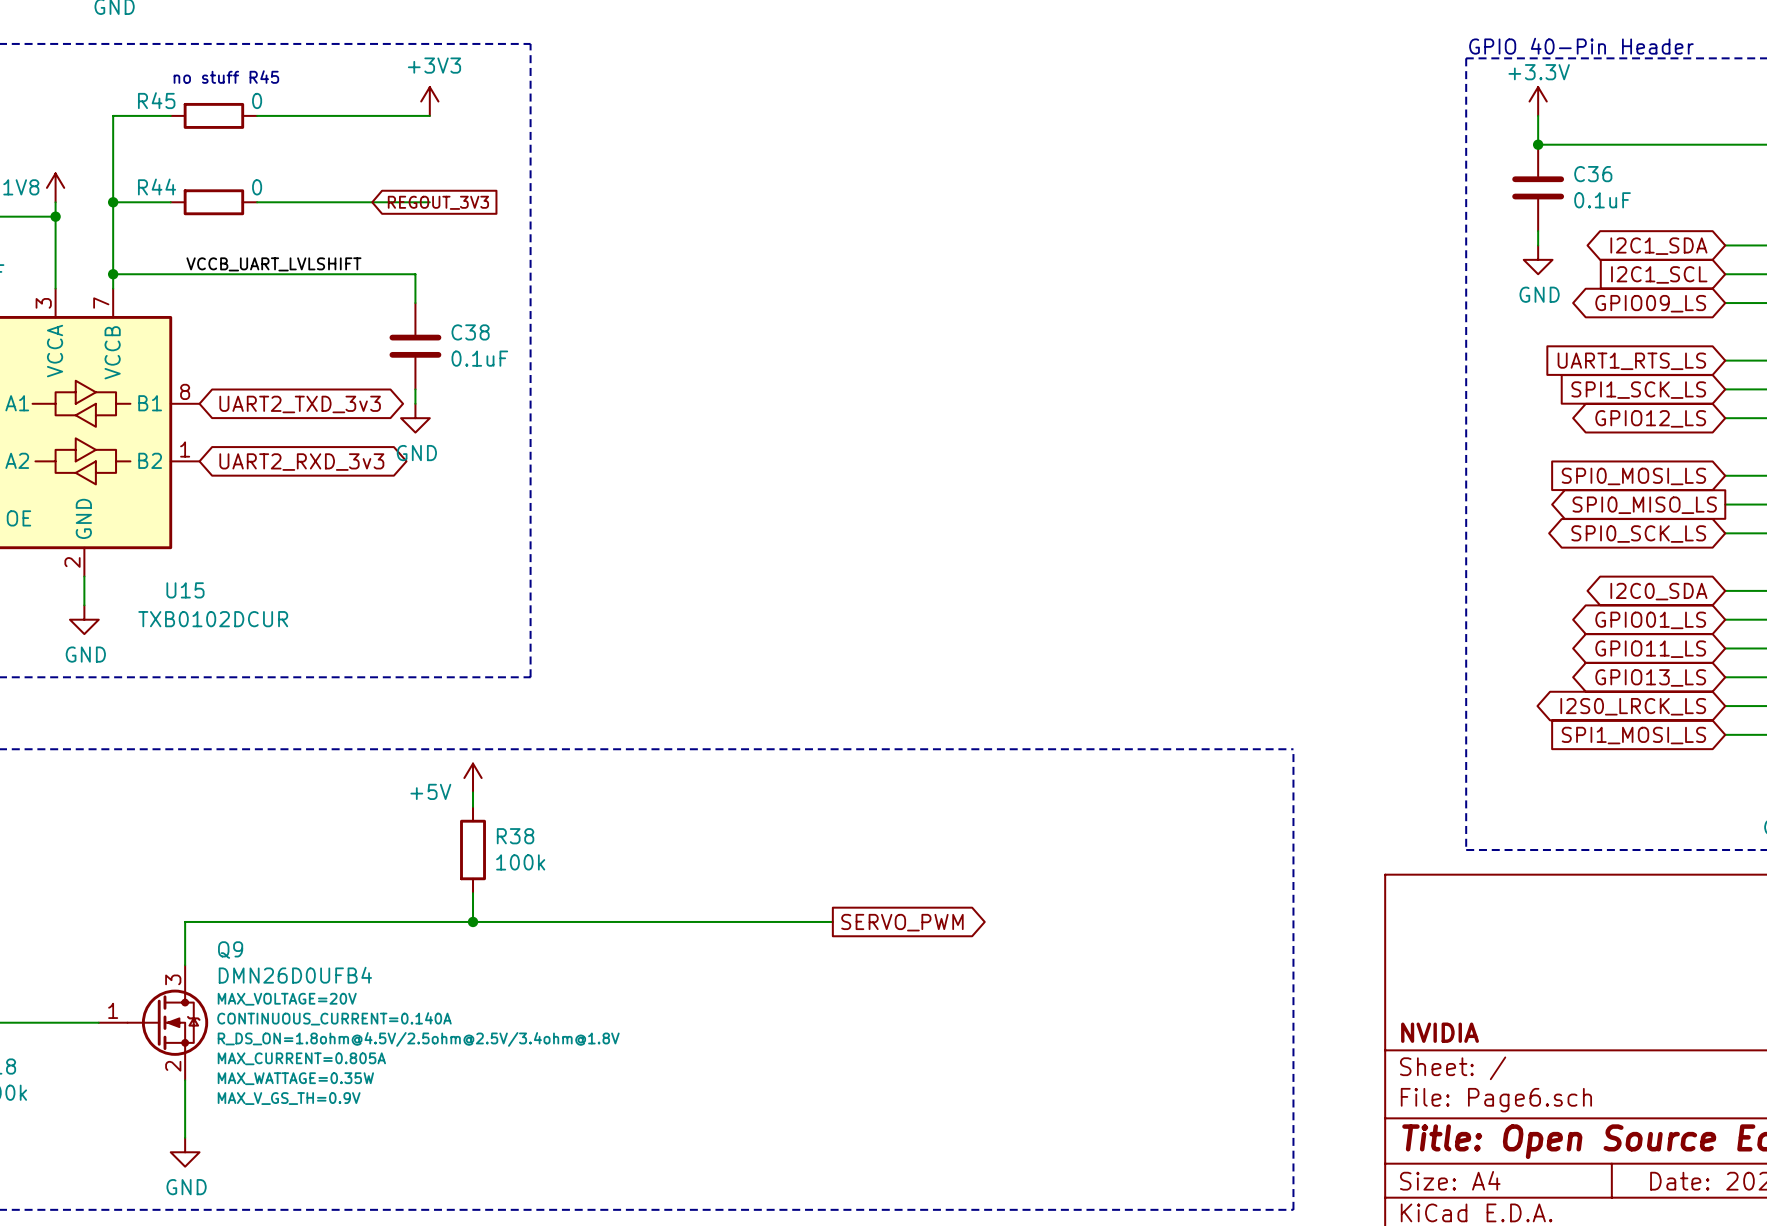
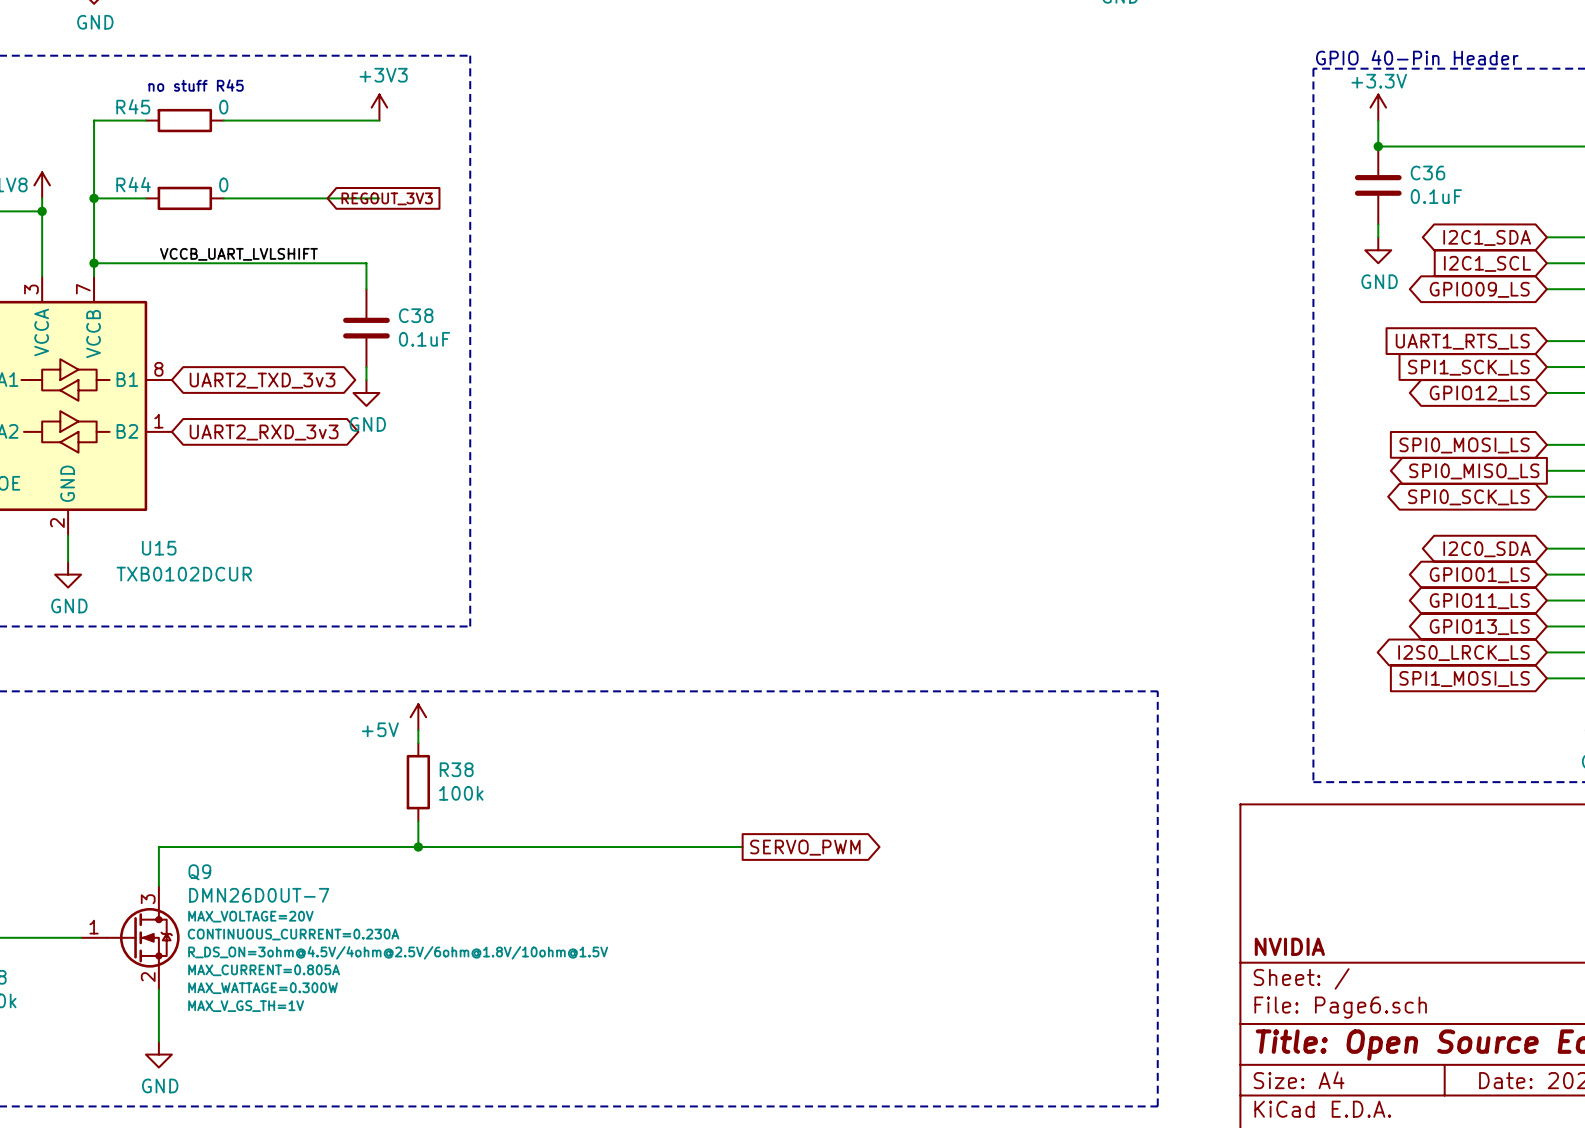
Q9 value: DMN26D0UFB4 (295, 975) -> DMN26D0UT-7 (259, 895)
Q9 text: CONTINUOUS_CURRENT=0.140A (334, 1018) -> CONTINUOUS_CURRENT=0.230A (293, 934)
Q9 text: R_DS_ON=1.8ohm@4.5V/2.5ohm@2.5V/3.4ohm@1.8V (418, 1039) -> R_DS_ON=3ohm@4.5V/4ohm@2.5V/6ohm@1.8V/10ohm@1.5V (398, 952)
Q9 text: MAX_WATTAGE=0.35W (295, 1078) -> MAX_WATTAGE=0.300W (263, 988)
Q9 text: MAX_V_GS_TH=0.9V (289, 1098) -> MAX_V_GS_TH=1V (246, 1006)

